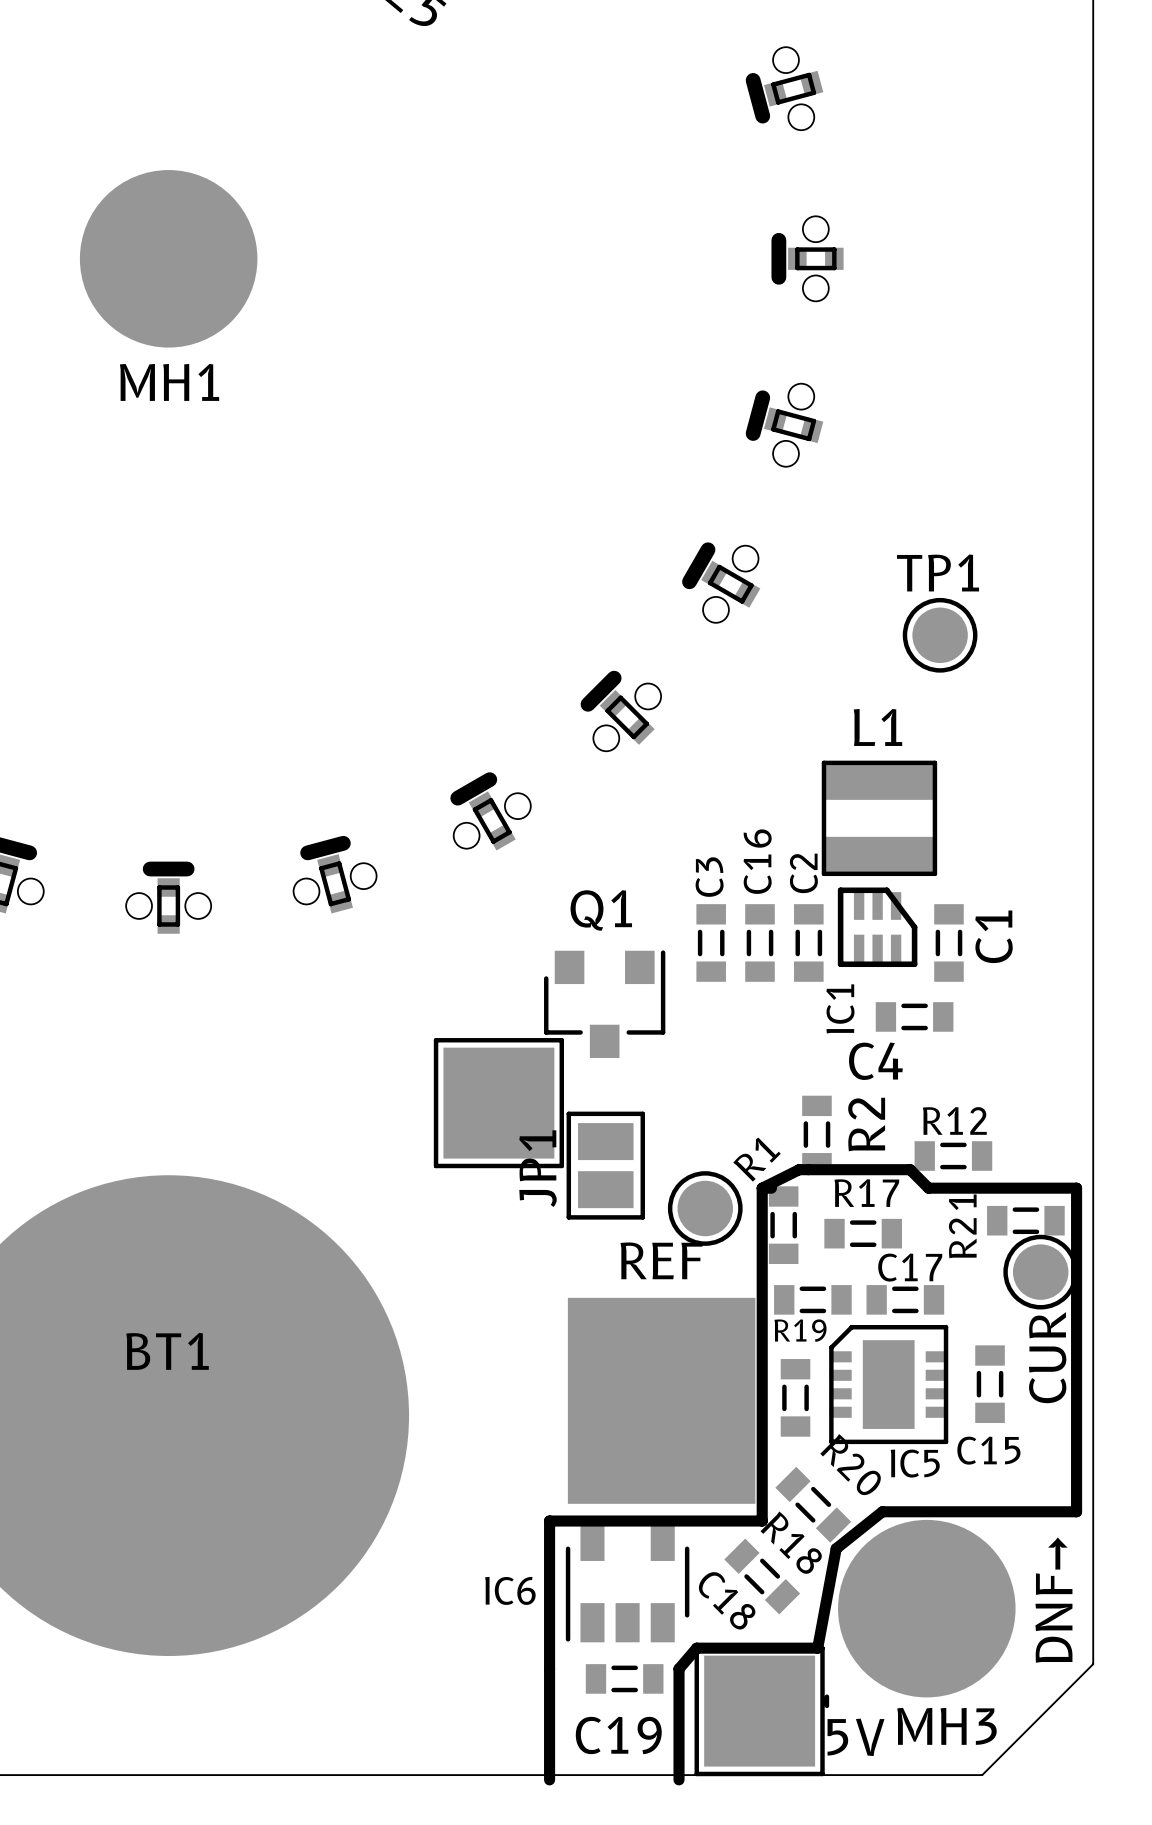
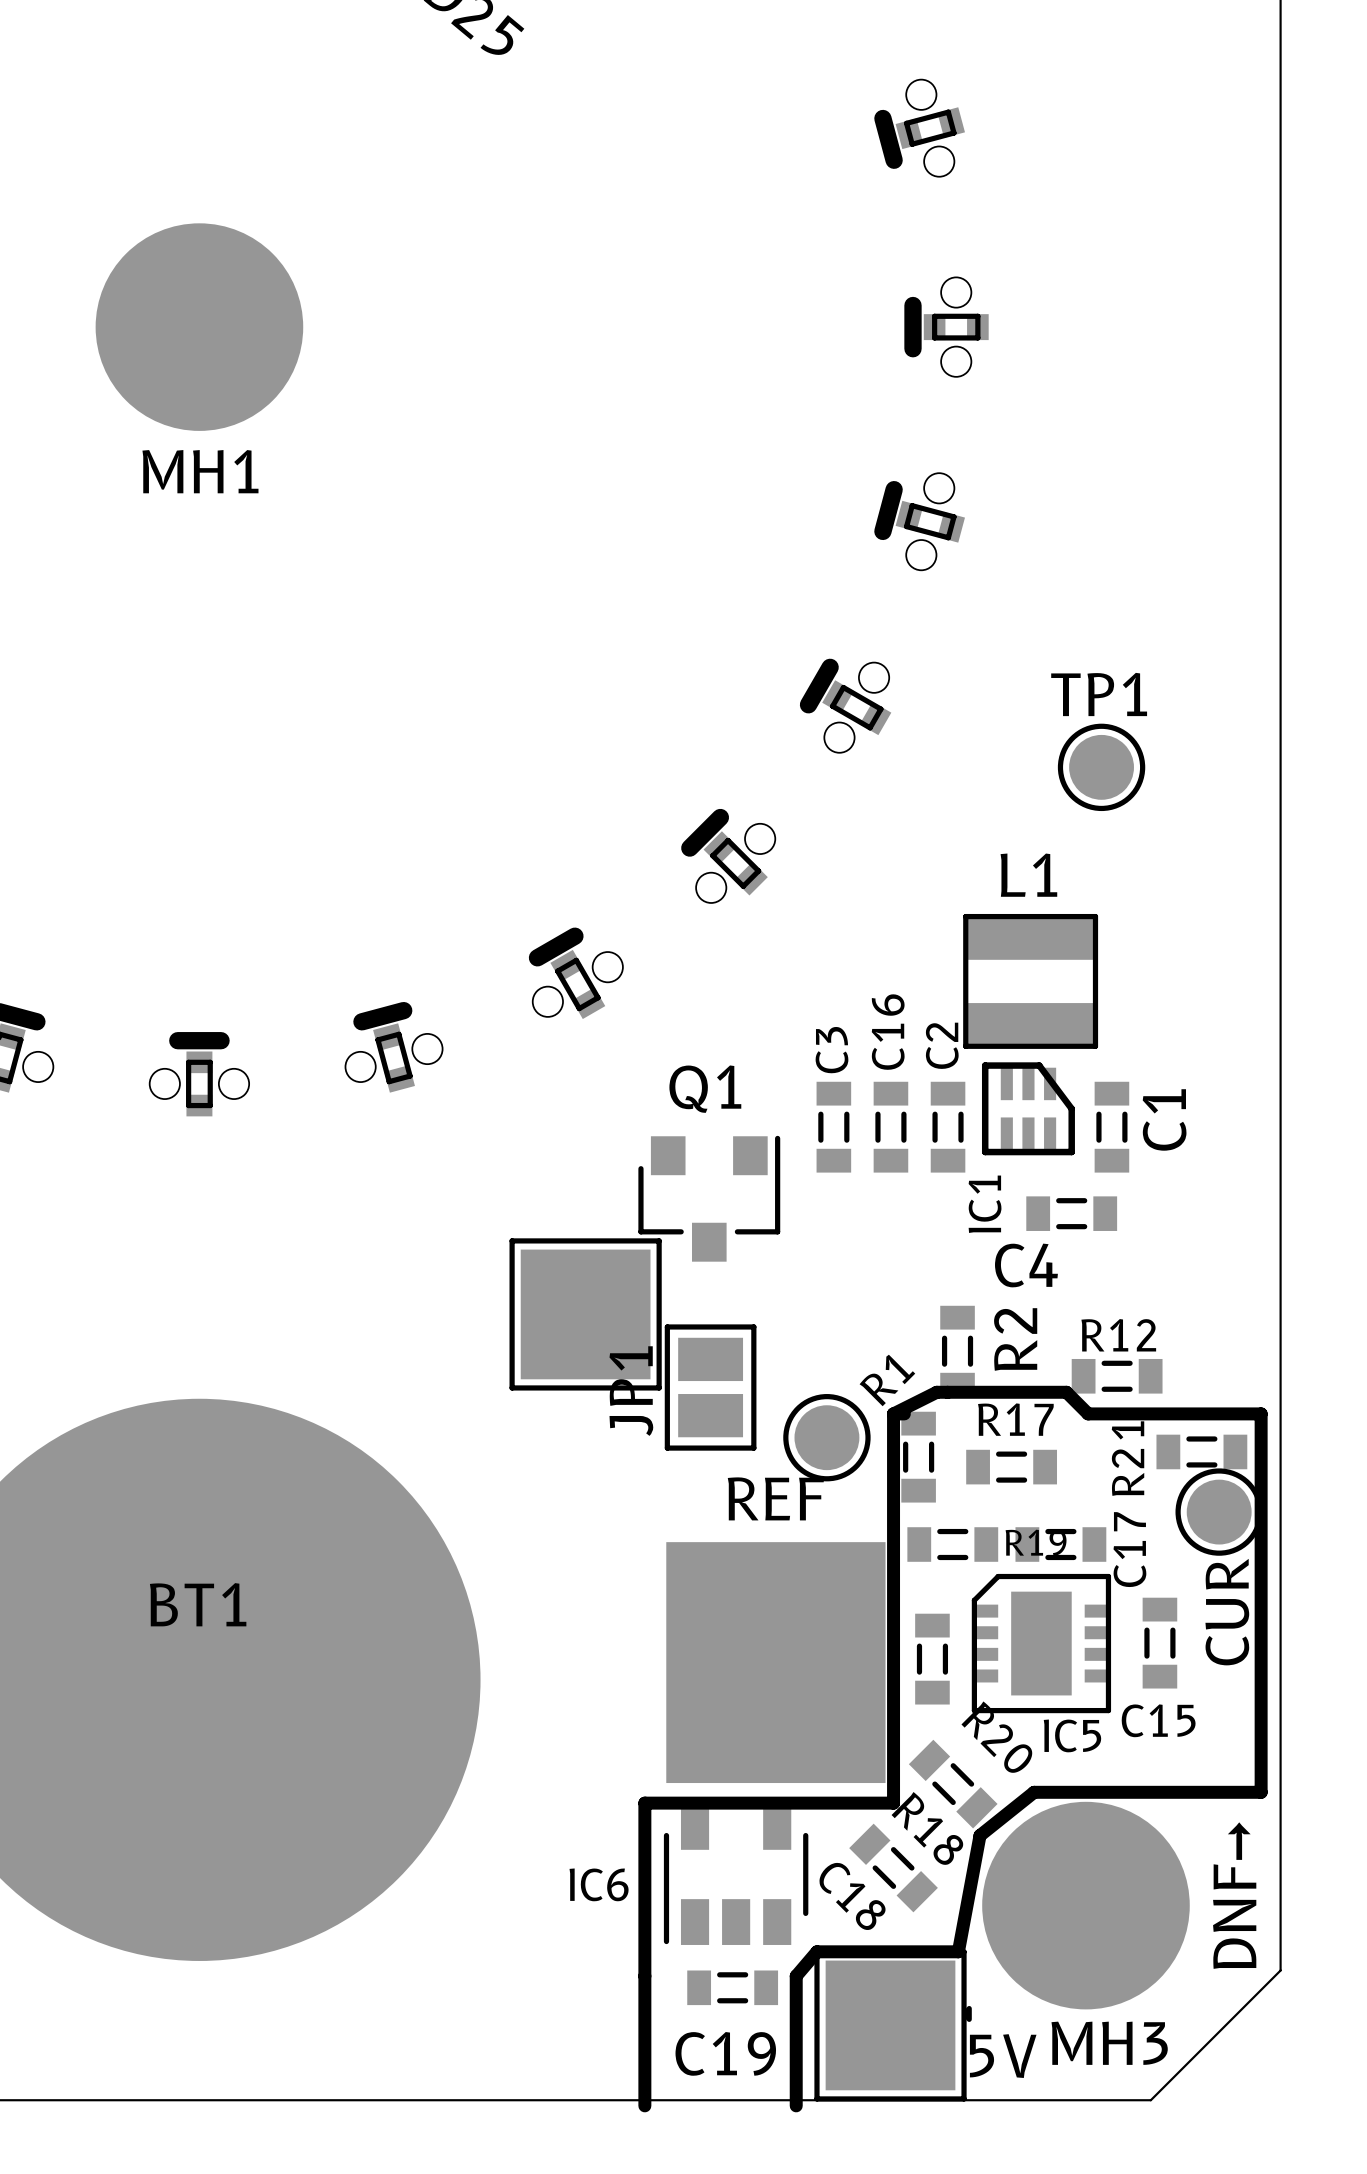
C17 name rotation: 0° (910, 1267) -> 90° counterclockwise (1129, 1549)
R19 name position: R19 (800, 1330) -> R19 (1036, 1542)

